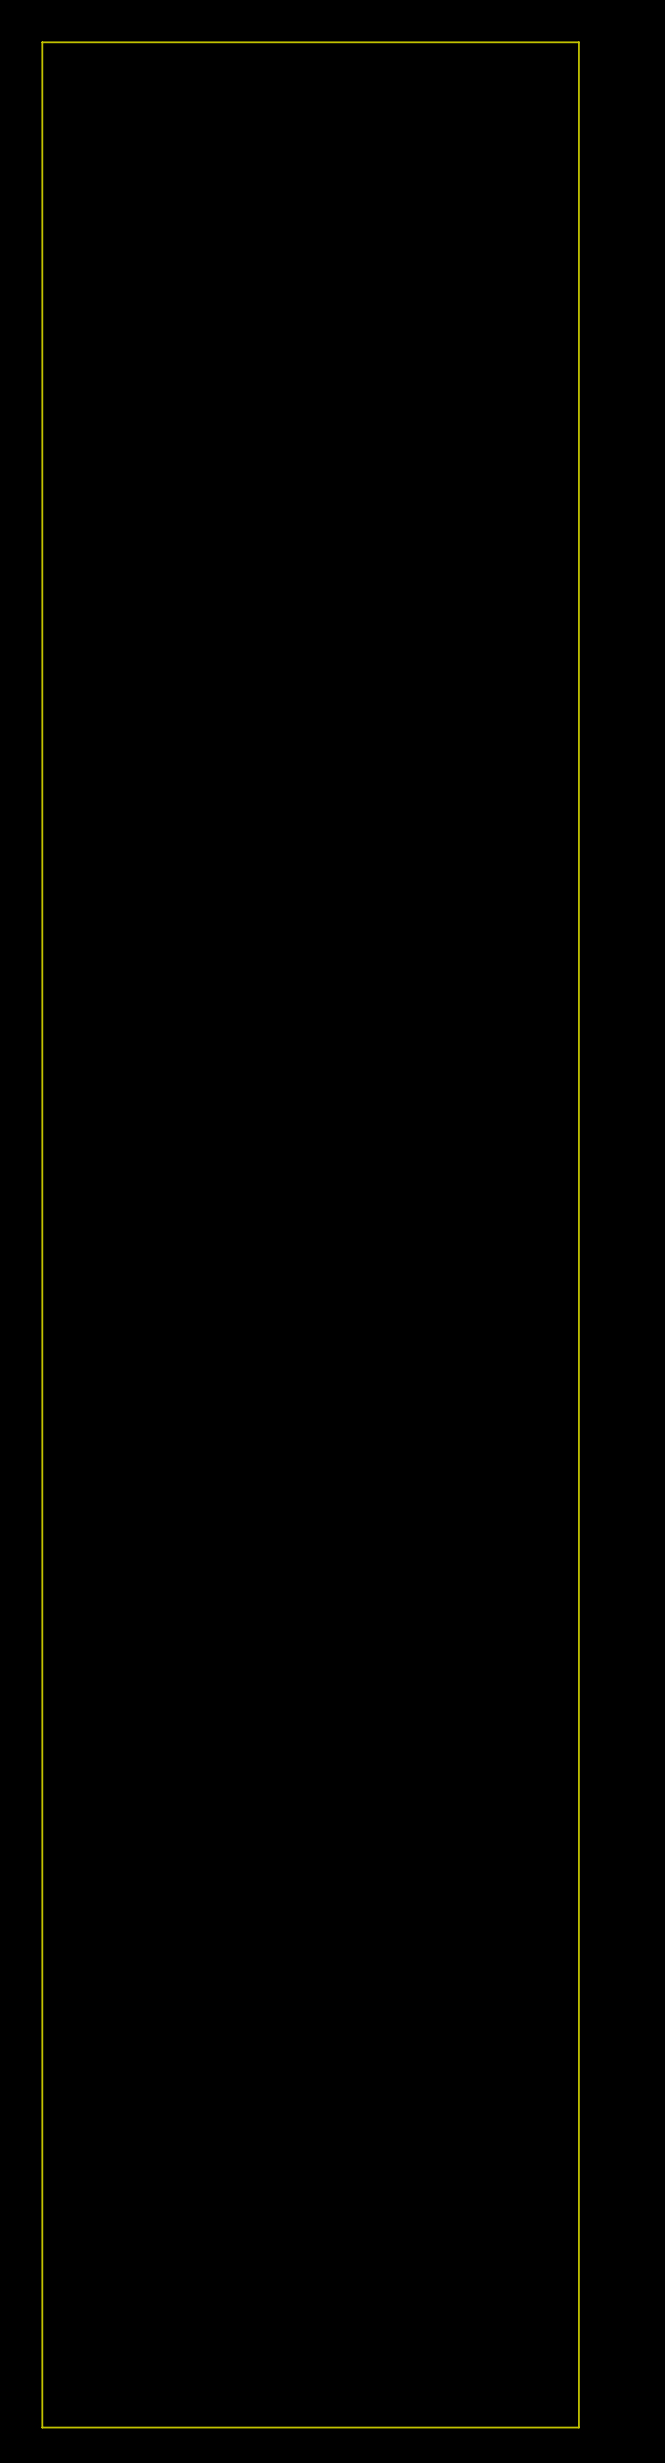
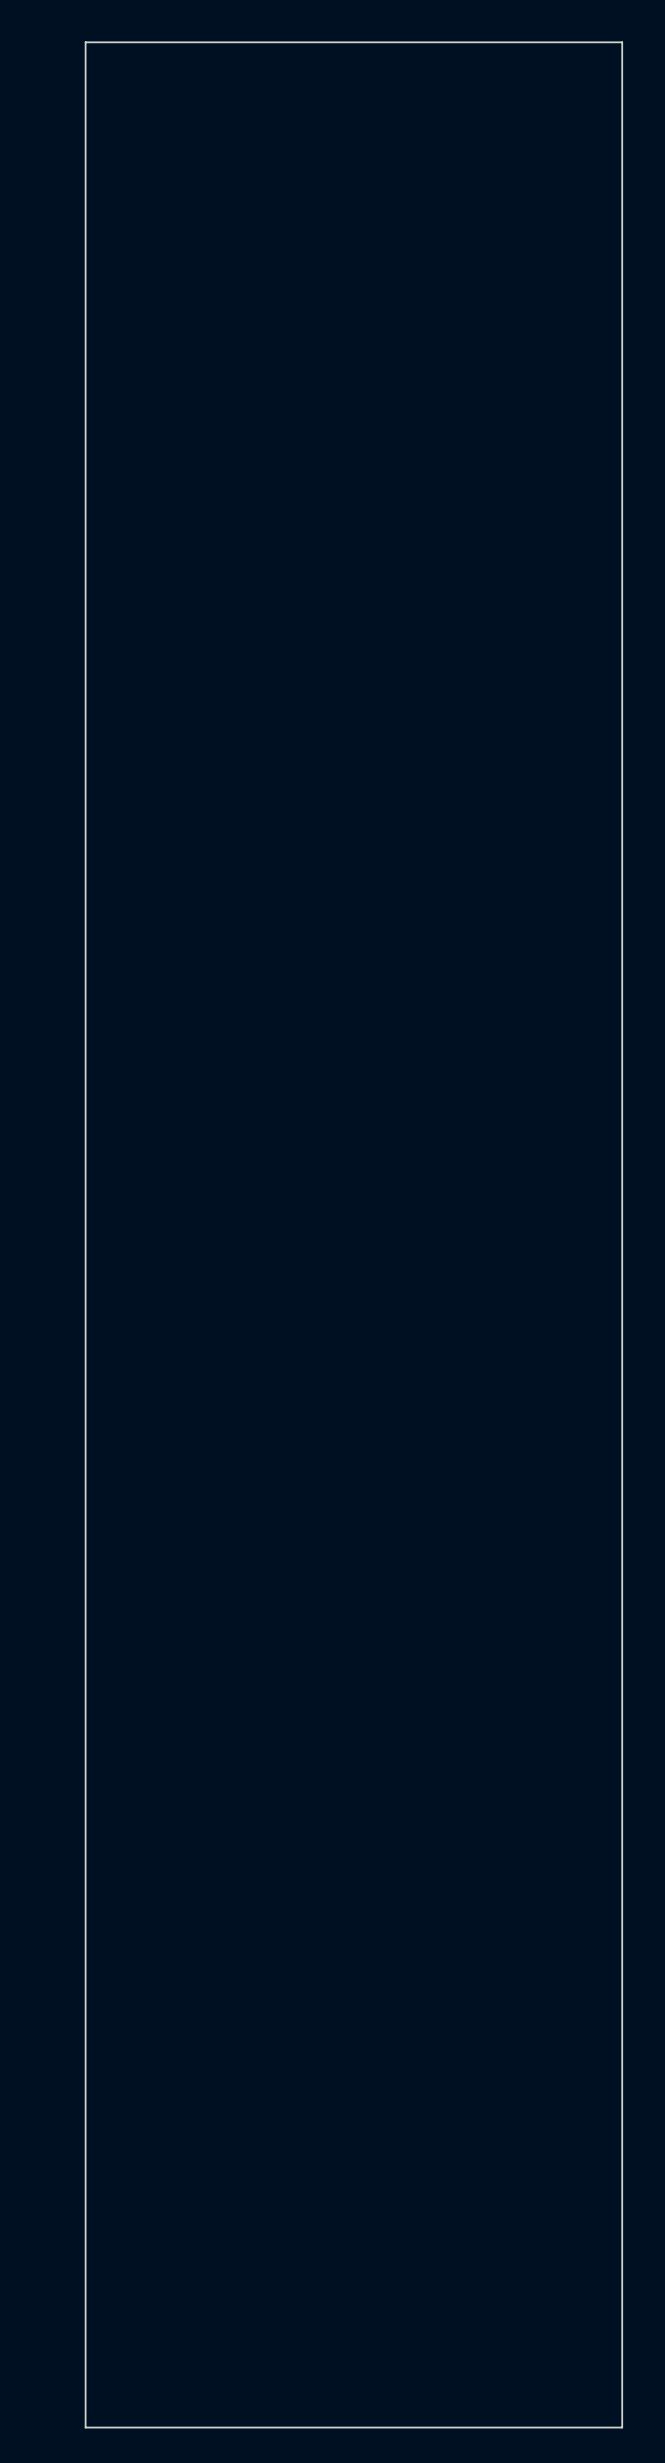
board edge: (85, 42) (42, 42) (42, 2427) (85, 2427) -> (85, 42) (85, 2427)
board edge: (578, 42) (578, 2427) -> (578, 42) (622, 42) (622, 2427) (578, 2427)

